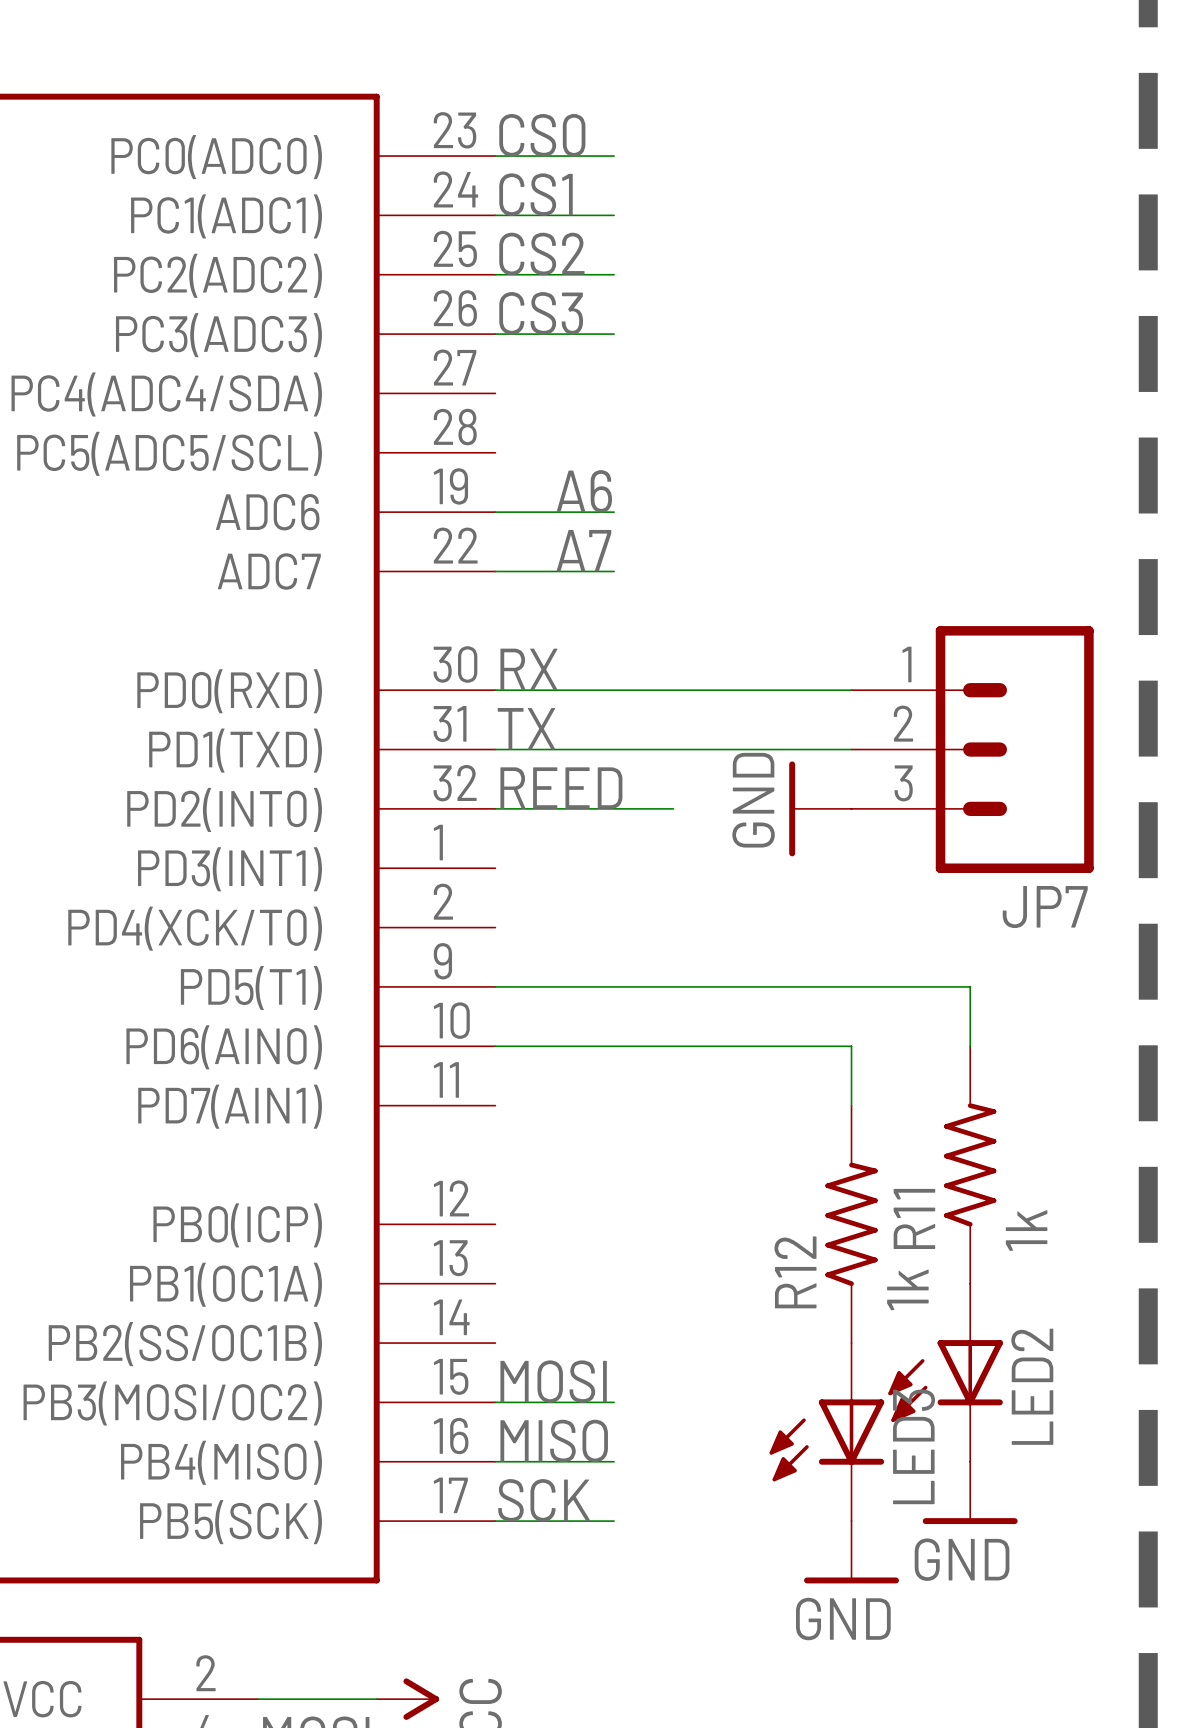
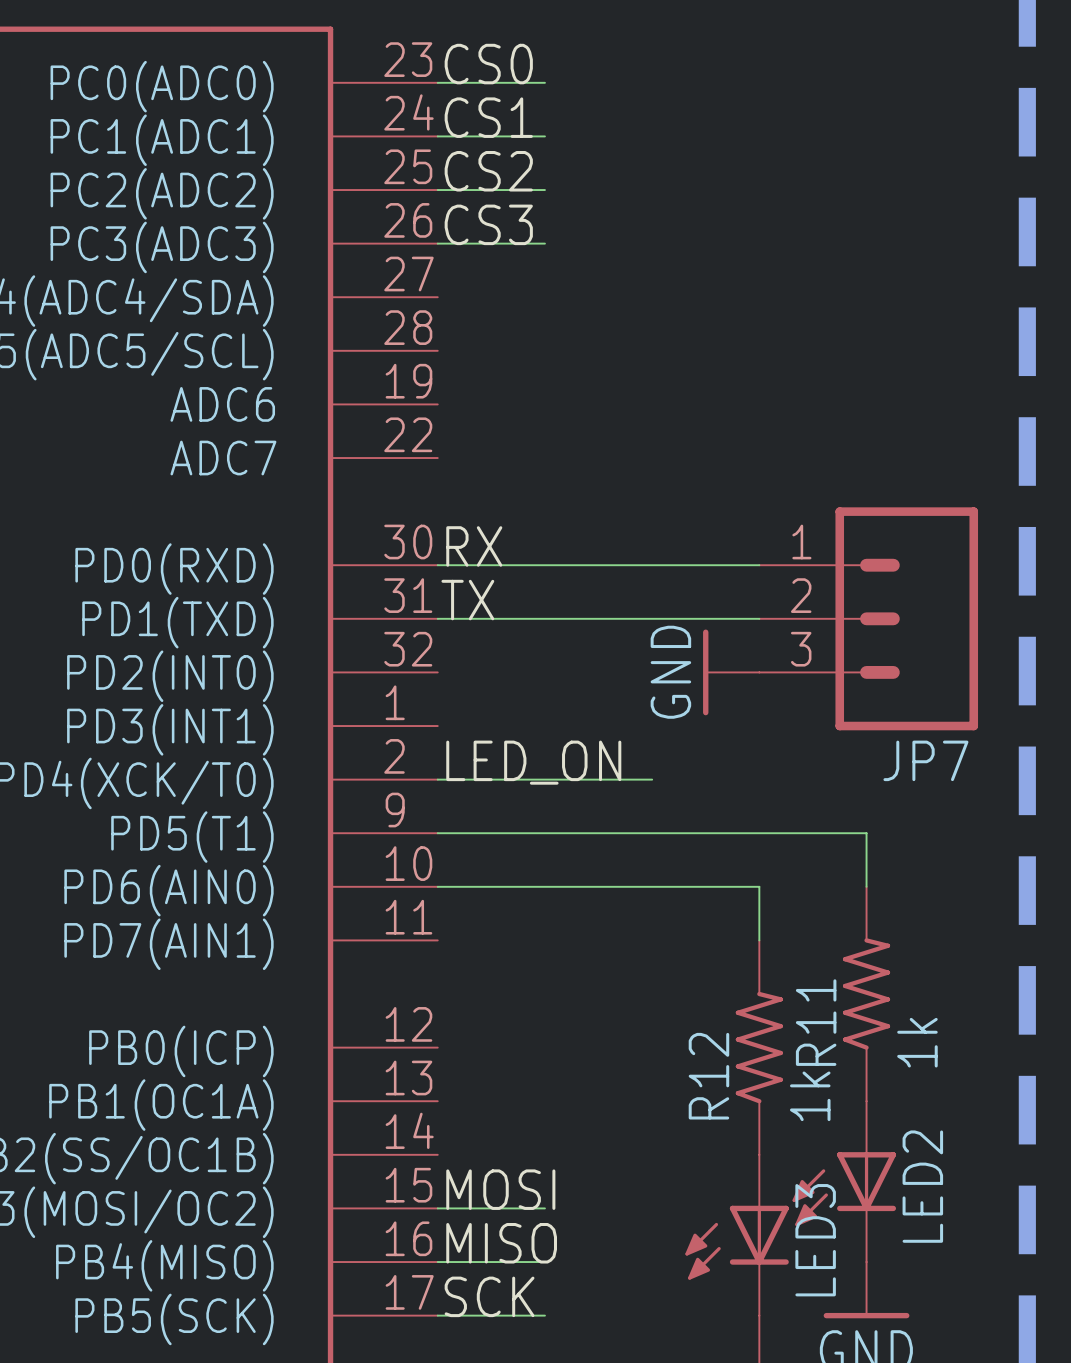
label: A6 (584, 491) -> none
wire: (495, 512) (614, 512) -> none
label: A7 (583, 550) -> none
wire: (495, 571) (614, 571) -> none
label: REED (561, 788) -> none
wire: (495, 808) (673, 808) -> none
label: none -> LED_ON (533, 762)
wire: none -> (437, 779) (652, 779)

